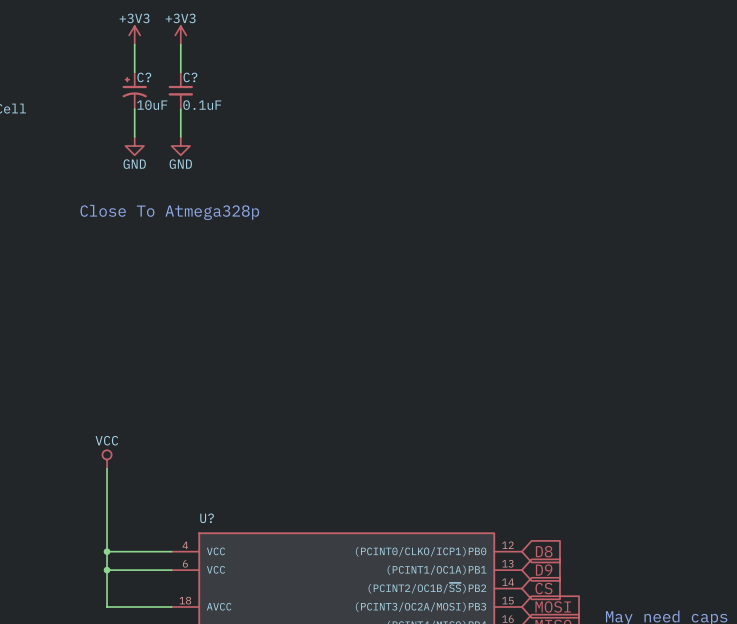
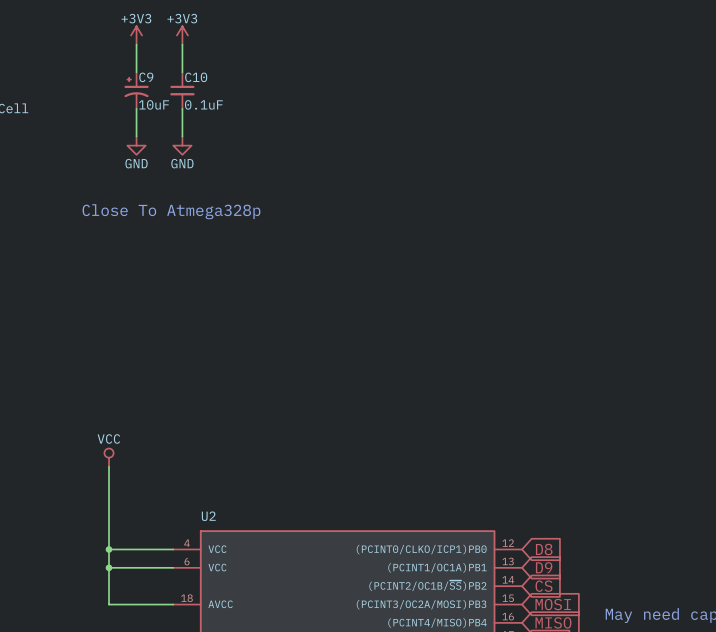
C? name: C? (144, 77) -> C9 (146, 77)
C? name: C? (190, 77) -> C10 (196, 77)
U? name: U? (207, 518) -> U2 (208, 516)

